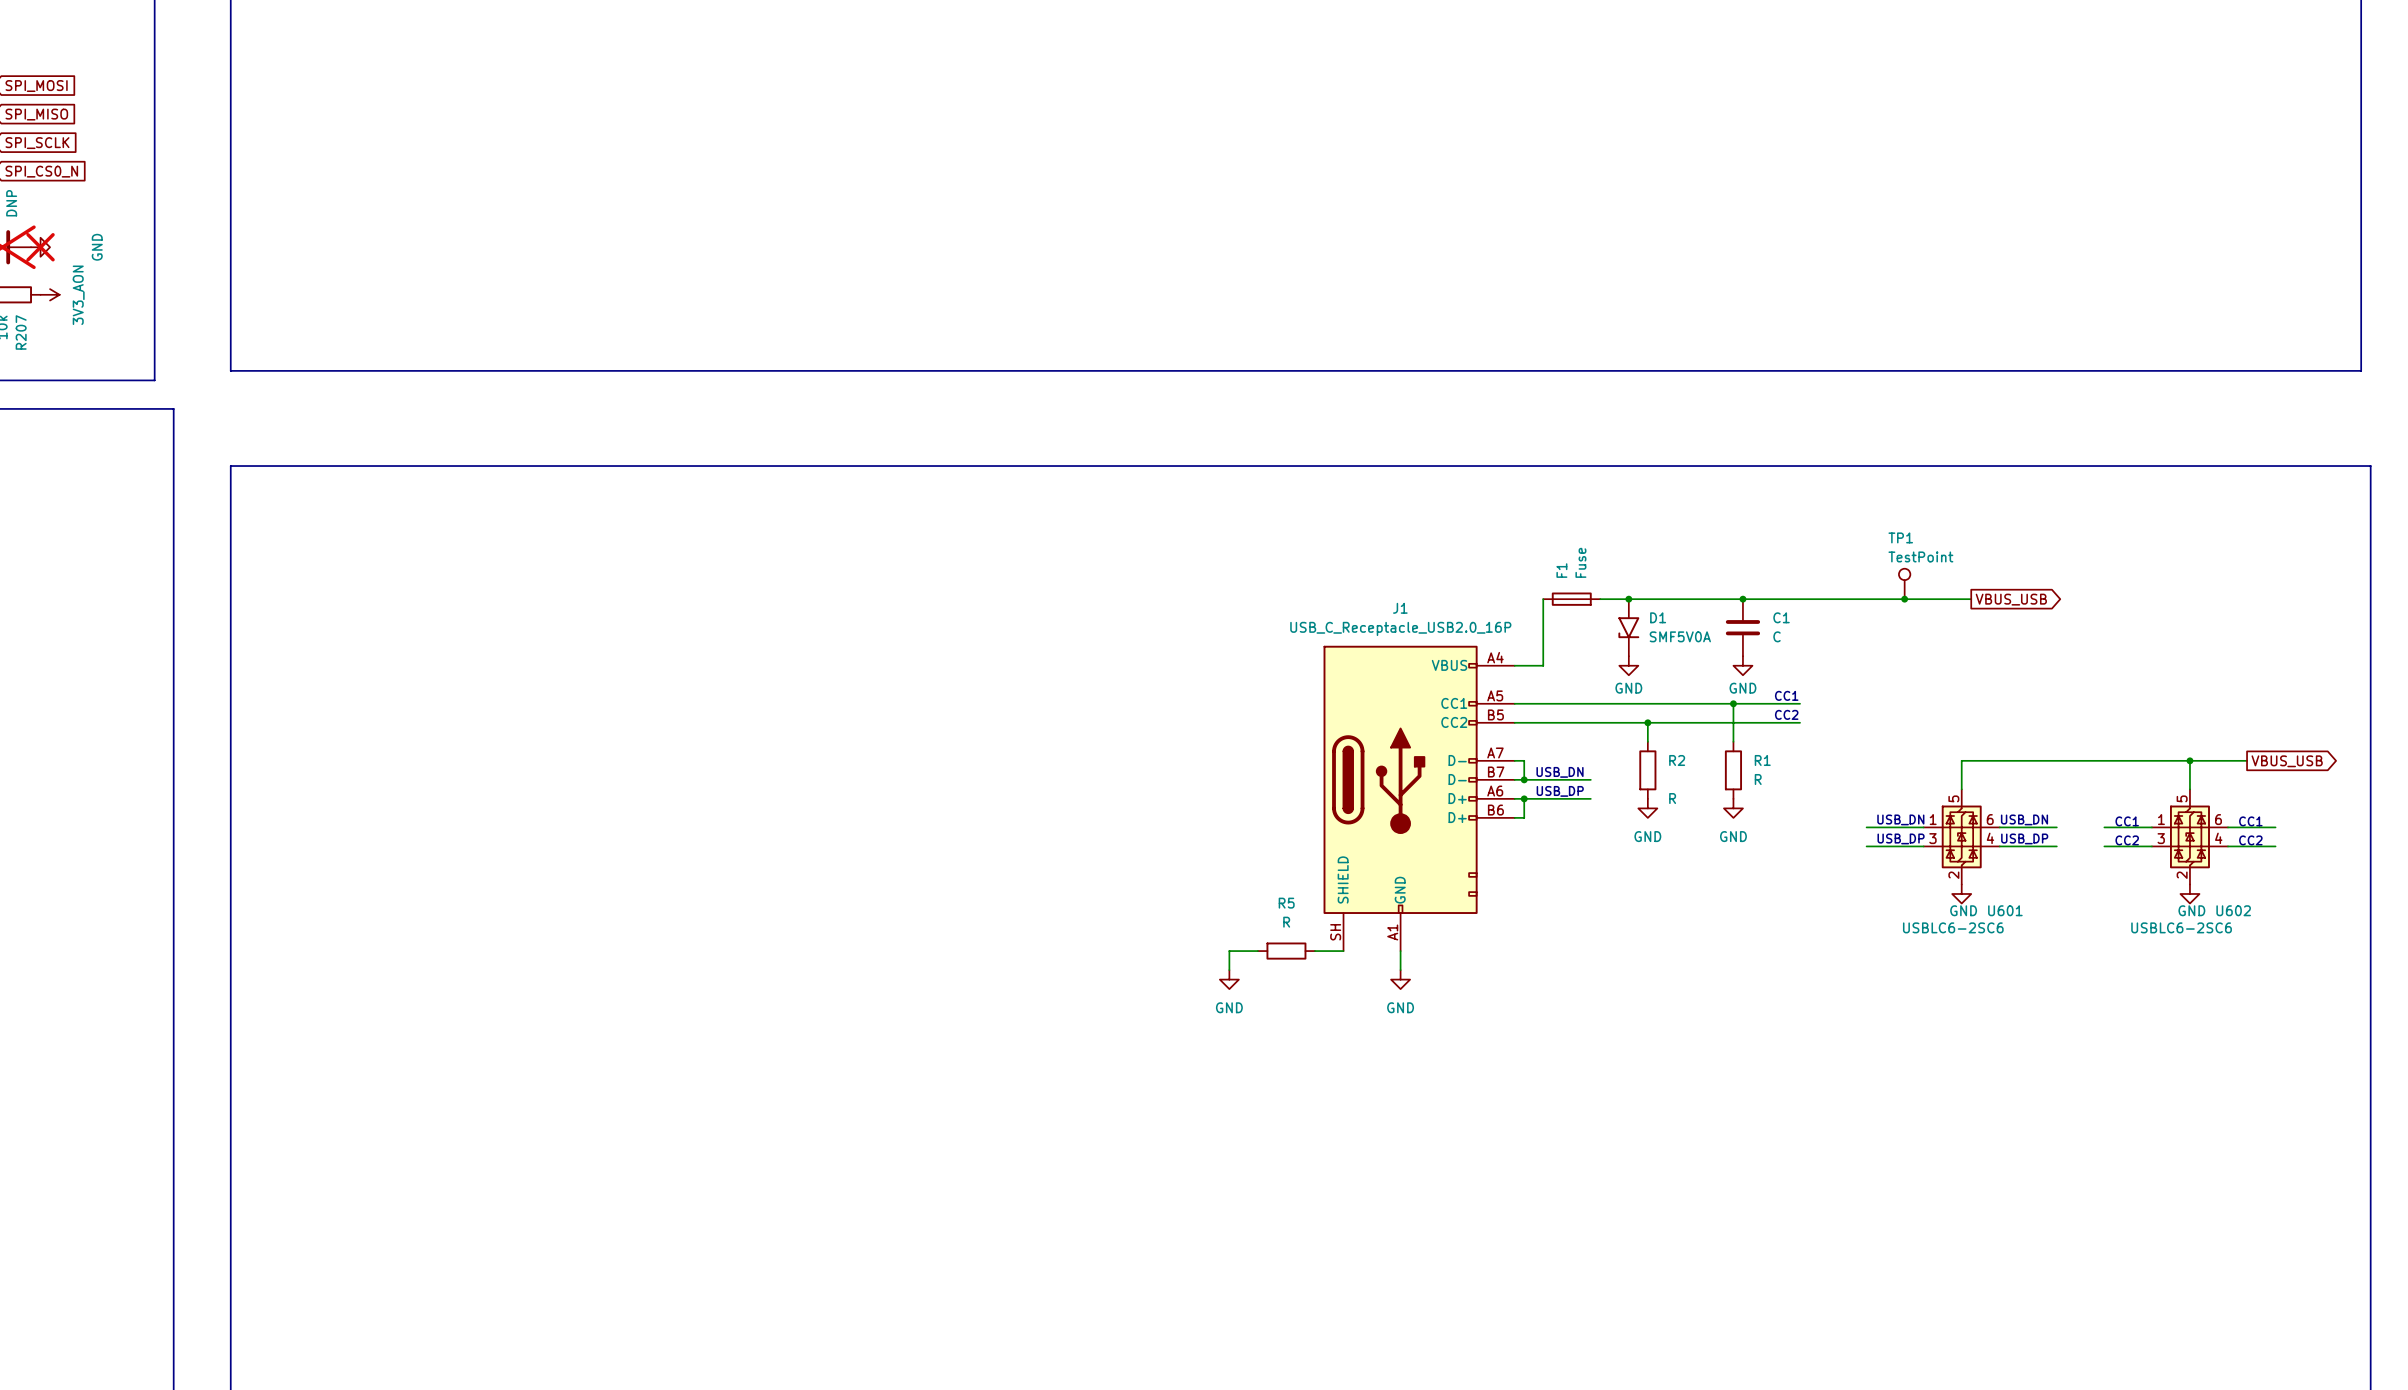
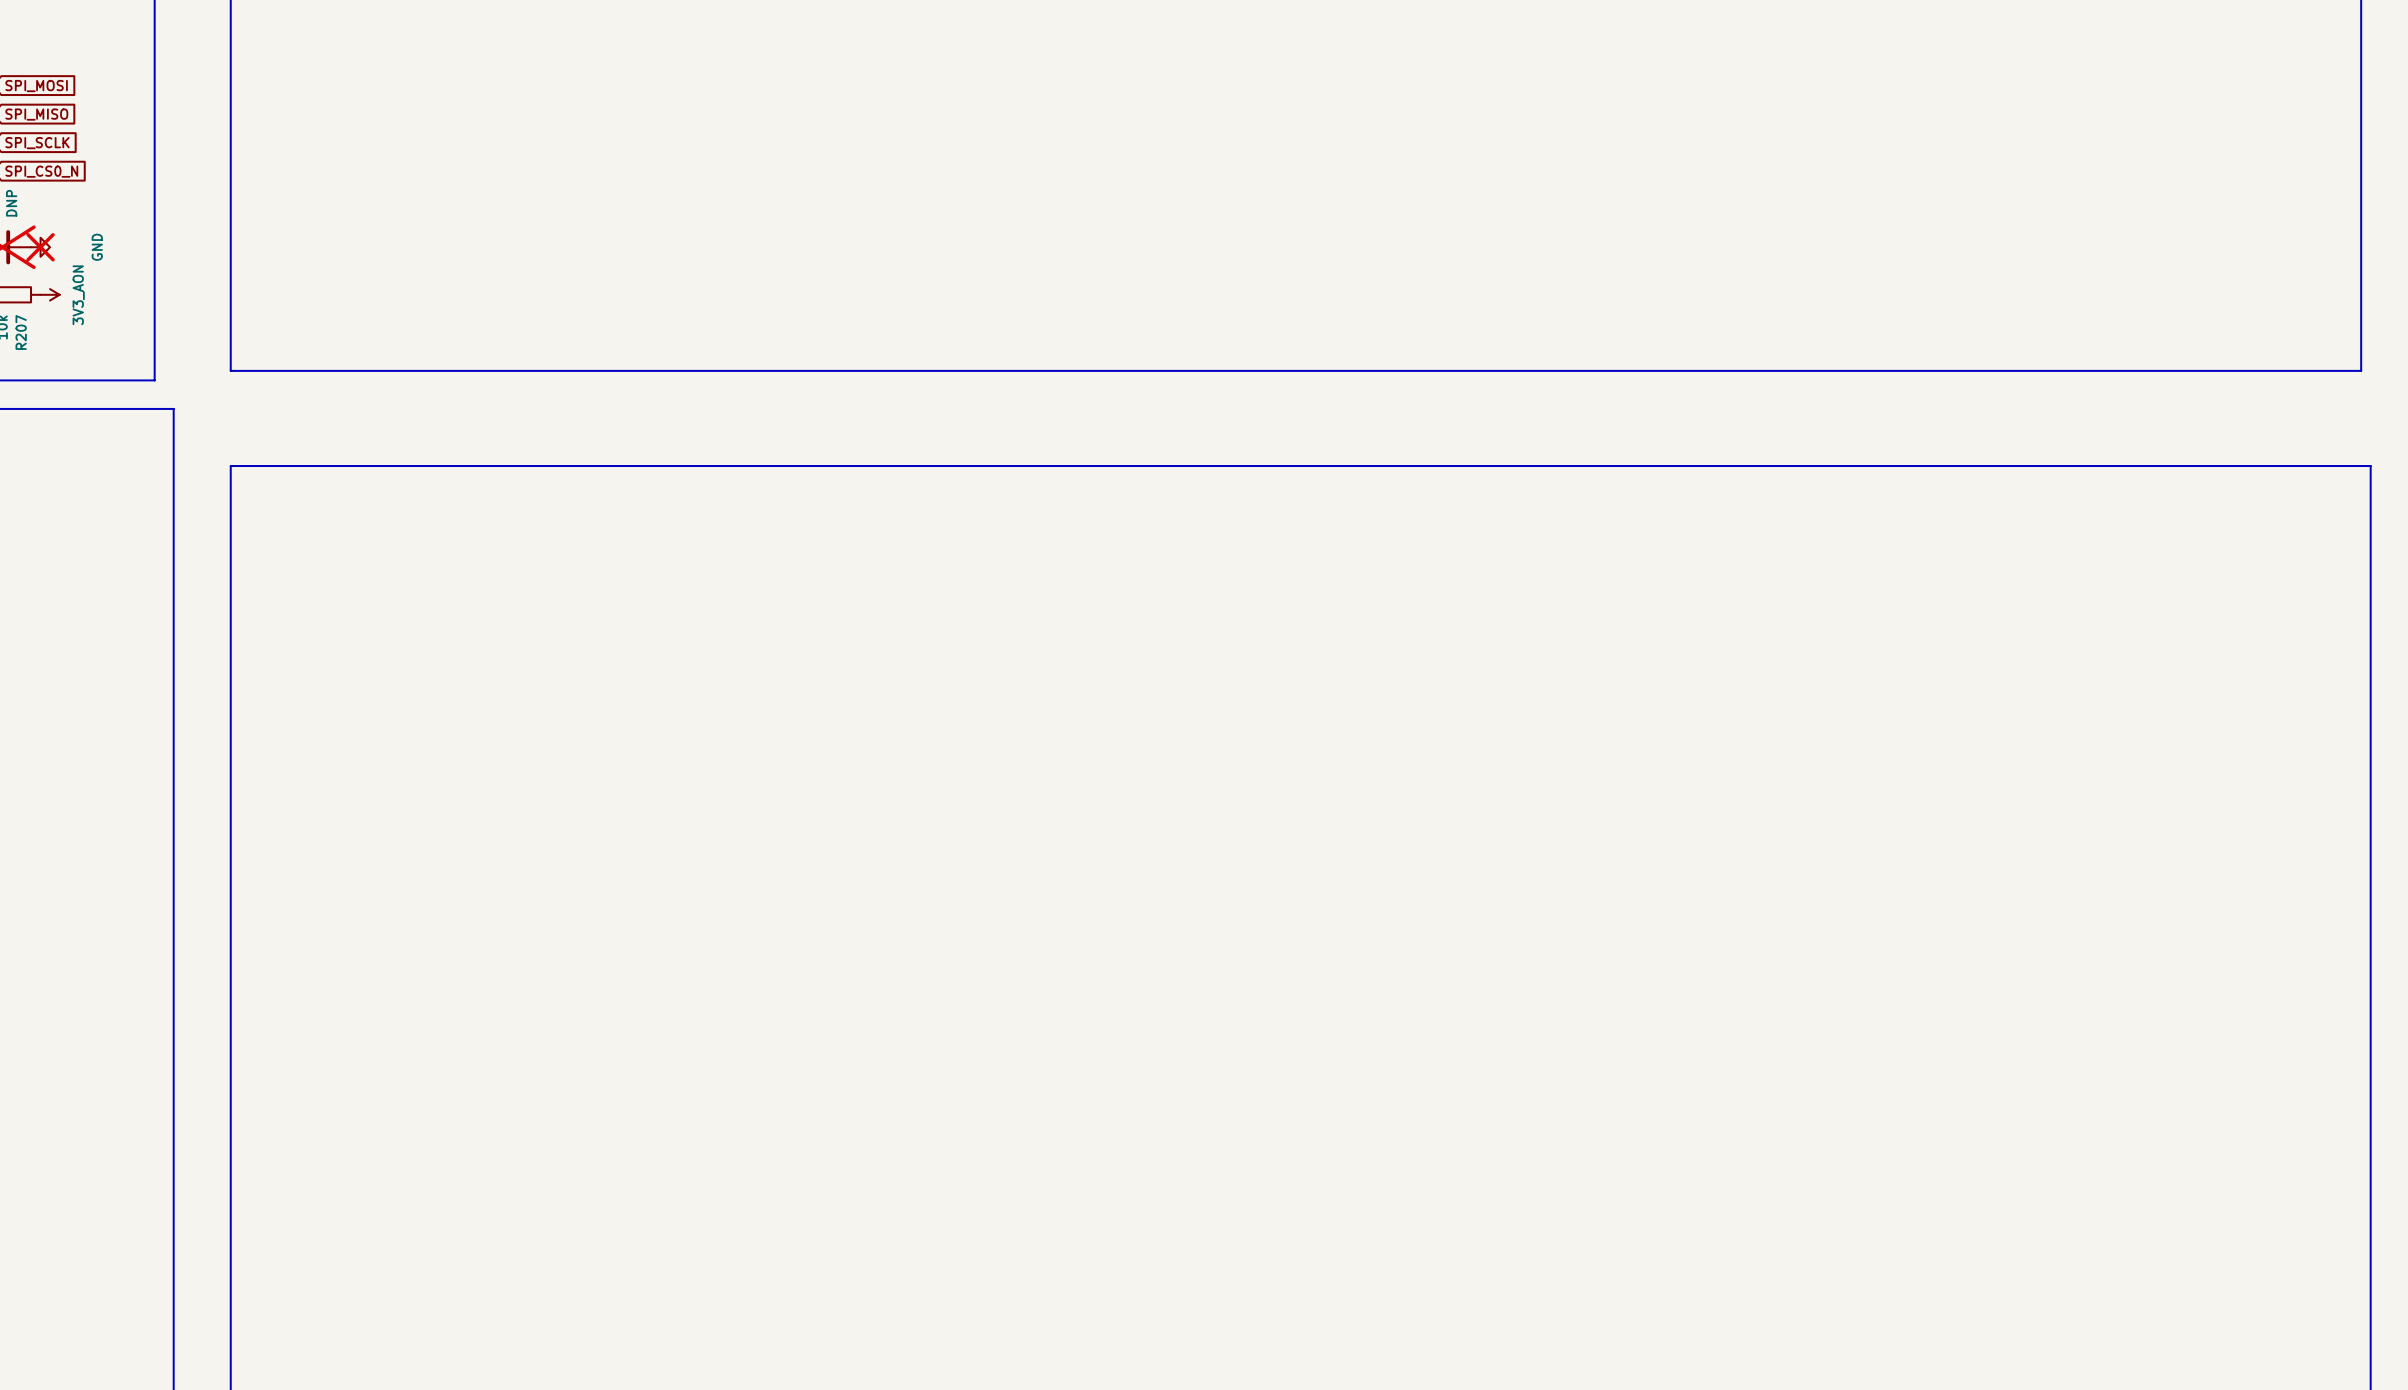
TP1: TestPoint (1904, 583) -> none
wire: (1543, 599) (1543, 665) (1514, 665) -> none
F1: Fuse (1571, 599) -> none
wire: (1600, 599) (1971, 599) -> none
junction: (1628, 599) -> none
junction: (1742, 599) -> none
junction: (1904, 599) -> none
global label: VBUS_USB (2011, 599) -> none
D1: SMF5V0A (1628, 627) -> none
C1: C (1742, 627) -> none
power symbol: GND (1628, 665) -> none
power symbol: GND (1742, 665) -> none
text: CC1 (1786, 695) -> none
wire: (1514, 703) (1800, 703) -> none
wire: (1733, 703) (1733, 741) -> none
junction: (1733, 703) -> none
text: CC2 (1786, 714) -> none
wire: (1514, 722) (1800, 722) -> none
wire: (1647, 722) (1647, 741) -> none
junction: (1647, 722) -> none
wire: (1514, 760) (1524, 760) (1524, 779) -> none
wire: (2189, 760) (2189, 789) -> none
junction: (2189, 760) -> none
wire: (2247, 760) (1961, 760) (1961, 789) -> none
global label: VBUS_USB (2287, 761) -> none
R2: R (1647, 770) -> none
R1: R (1733, 770) -> none
text: USB_DN (1560, 772) -> none
wire: (1514, 779) (1590, 779) -> none
junction: (1524, 779) -> none
text: USB_DP (1560, 791) -> none
J1: USB_C_Receptacle_USB2.0_16P (1419, 798) -> none
wire: (1514, 798) (1590, 798) -> none
wire: (1524, 798) (1524, 817) (1514, 817) -> none
junction: (1524, 798) -> none
power symbol: GND (1647, 808) -> none
power symbol: GND (1733, 808) -> none
text: USB_DN (1900, 819) -> none
text: USB_DN (2024, 819) -> none
text: CC1 (2127, 821) -> none
text: CC1 (2250, 821) -> none
wire: (1866, 827) (1923, 827) -> none
wire: (1999, 827) (2056, 827) -> none
wire: (2104, 827) (2151, 827) -> none
wire: (2228, 827) (2275, 827) -> none
U601: USBLC6-2SC6 (1961, 836) -> none
U602: USBLC6-2SC6 (2189, 836) -> none
text: USB_DP (1901, 838) -> none
text: USB_DP (2024, 838) -> none
text: CC2 (2127, 840) -> none
text: CC2 (2250, 840) -> none
wire: (1866, 846) (1923, 846) -> none
wire: (1999, 846) (2056, 846) -> none
wire: (2104, 846) (2151, 846) -> none
wire: (2228, 846) (2275, 846) -> none
power symbol: GND (1961, 893) -> none
power symbol: GND (2189, 893) -> none
wire: (1257, 951) (1229, 951) (1229, 970) -> none
R5: R (1286, 951) -> none
wire: (1314, 951) (1343, 951) -> none
wire: (1400, 951) (1400, 970) -> none
power symbol: GND (1229, 979) -> none
power symbol: GND (1400, 979) -> none

